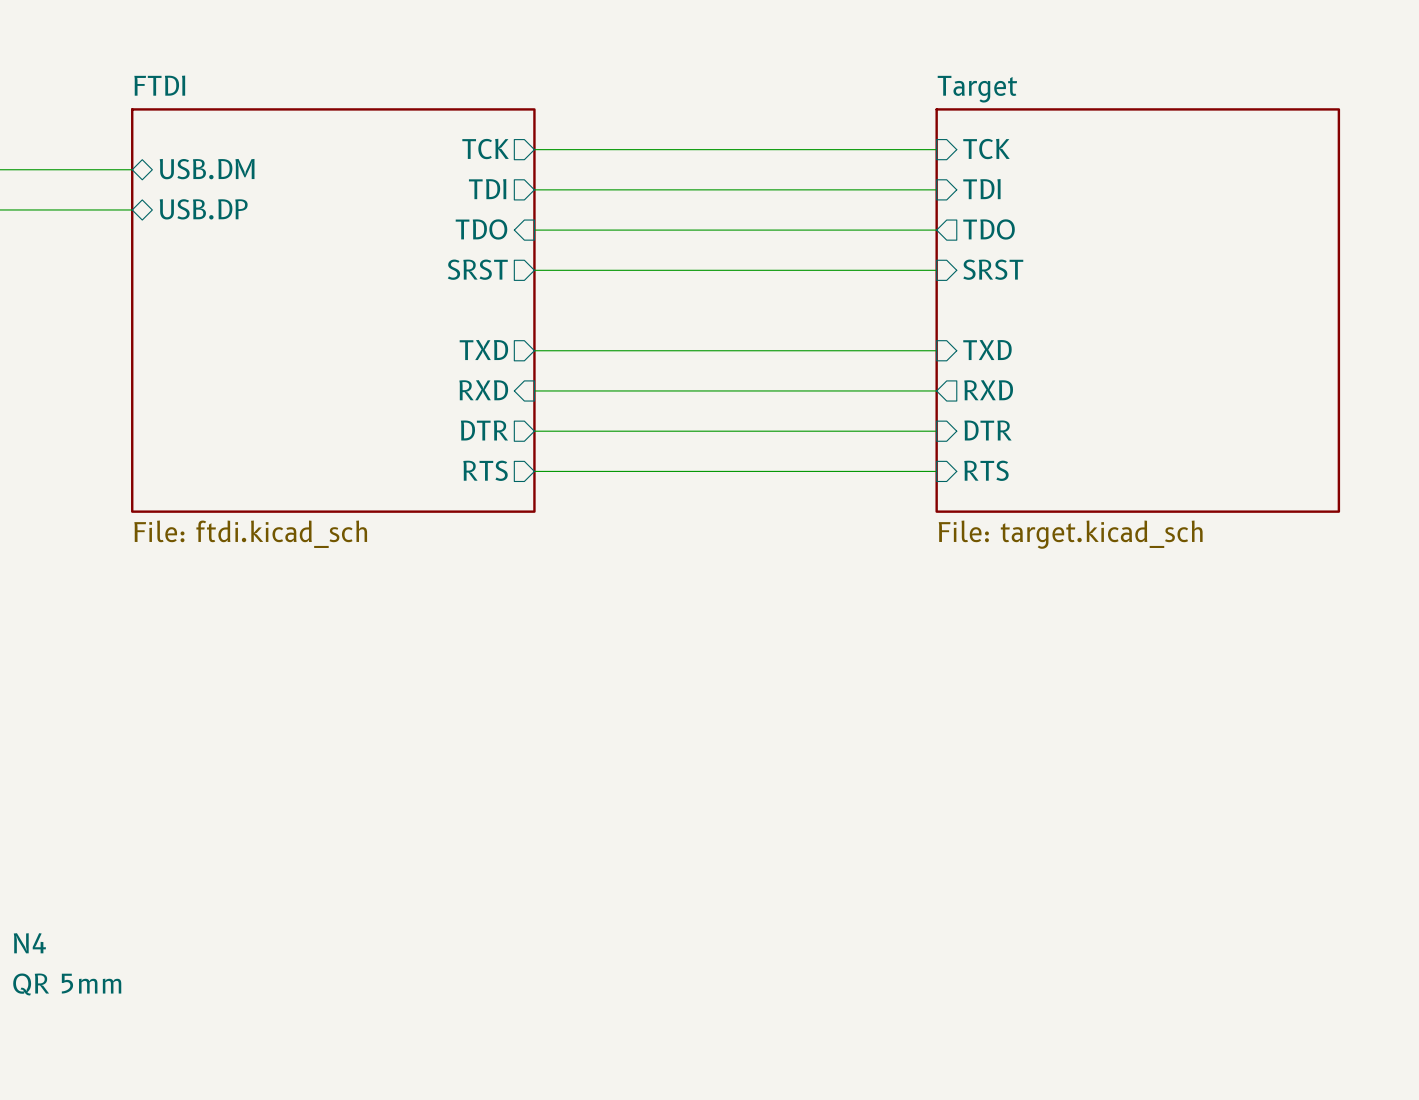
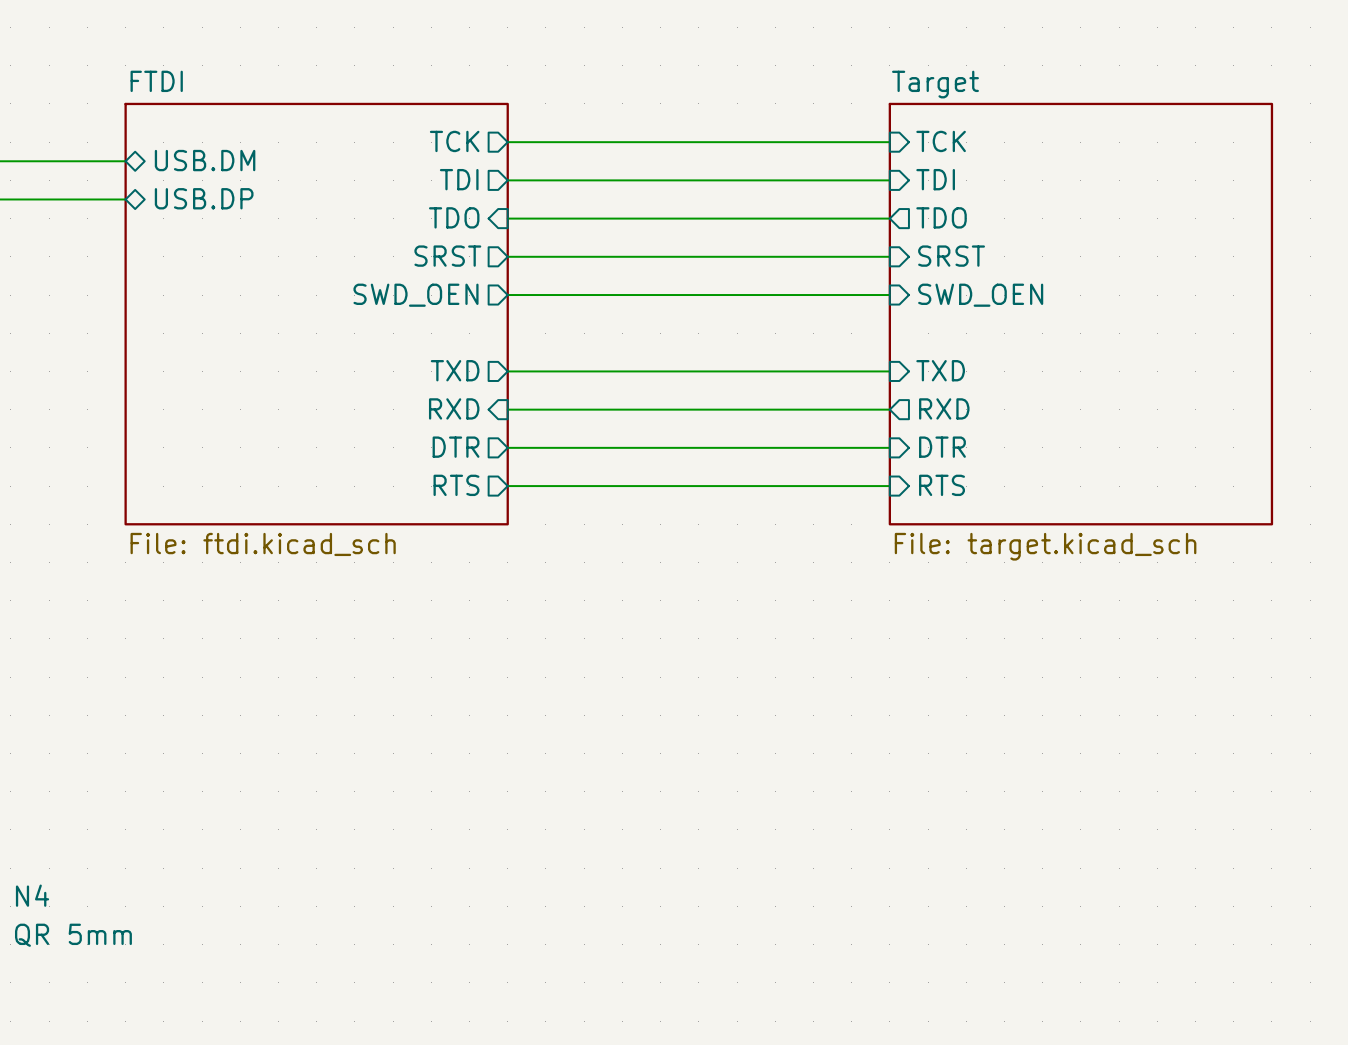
sheet FTDI: File: ftdi.kicad_sch (333, 310) -> none
sheet Target: File: target.kicad_sch (1137, 310) -> none
sheet pin: none -> SWD_OEN (416, 295)
sheet pin: none -> SWD_OEN (980, 295)
sheet FTDI: none -> File: ftdi.kicad_sch (316, 314)
sheet Target: none -> File: target.kicad_sch (1080, 314)
sheet pin: TXD (483, 350) -> none
wire: (534, 350) (936, 350) -> (507, 295) (889, 295)
sheet pin: TXD (987, 350) -> none
sheet pin shape: input (483, 390) -> output (455, 370)
sheet pin: RXD (483, 390) -> TXD (455, 370)
sheet pin shape: output (988, 390) -> input (940, 370)
sheet pin: RXD (988, 390) -> TXD (940, 370)
sheet pin shape: output (484, 430) -> input (454, 408)
sheet pin: DTR (484, 430) -> RXD (454, 408)
sheet pin shape: input (988, 430) -> output (944, 408)
sheet pin: DTR (988, 430) -> RXD (944, 408)
sheet pin: RTS (485, 470) -> DTR (456, 447)
sheet pin: RTS (986, 470) -> DTR (942, 447)
sheet pin: none -> RTS (456, 485)
wire: none -> (507, 486) (889, 486)
sheet pin: none -> RTS (942, 485)

